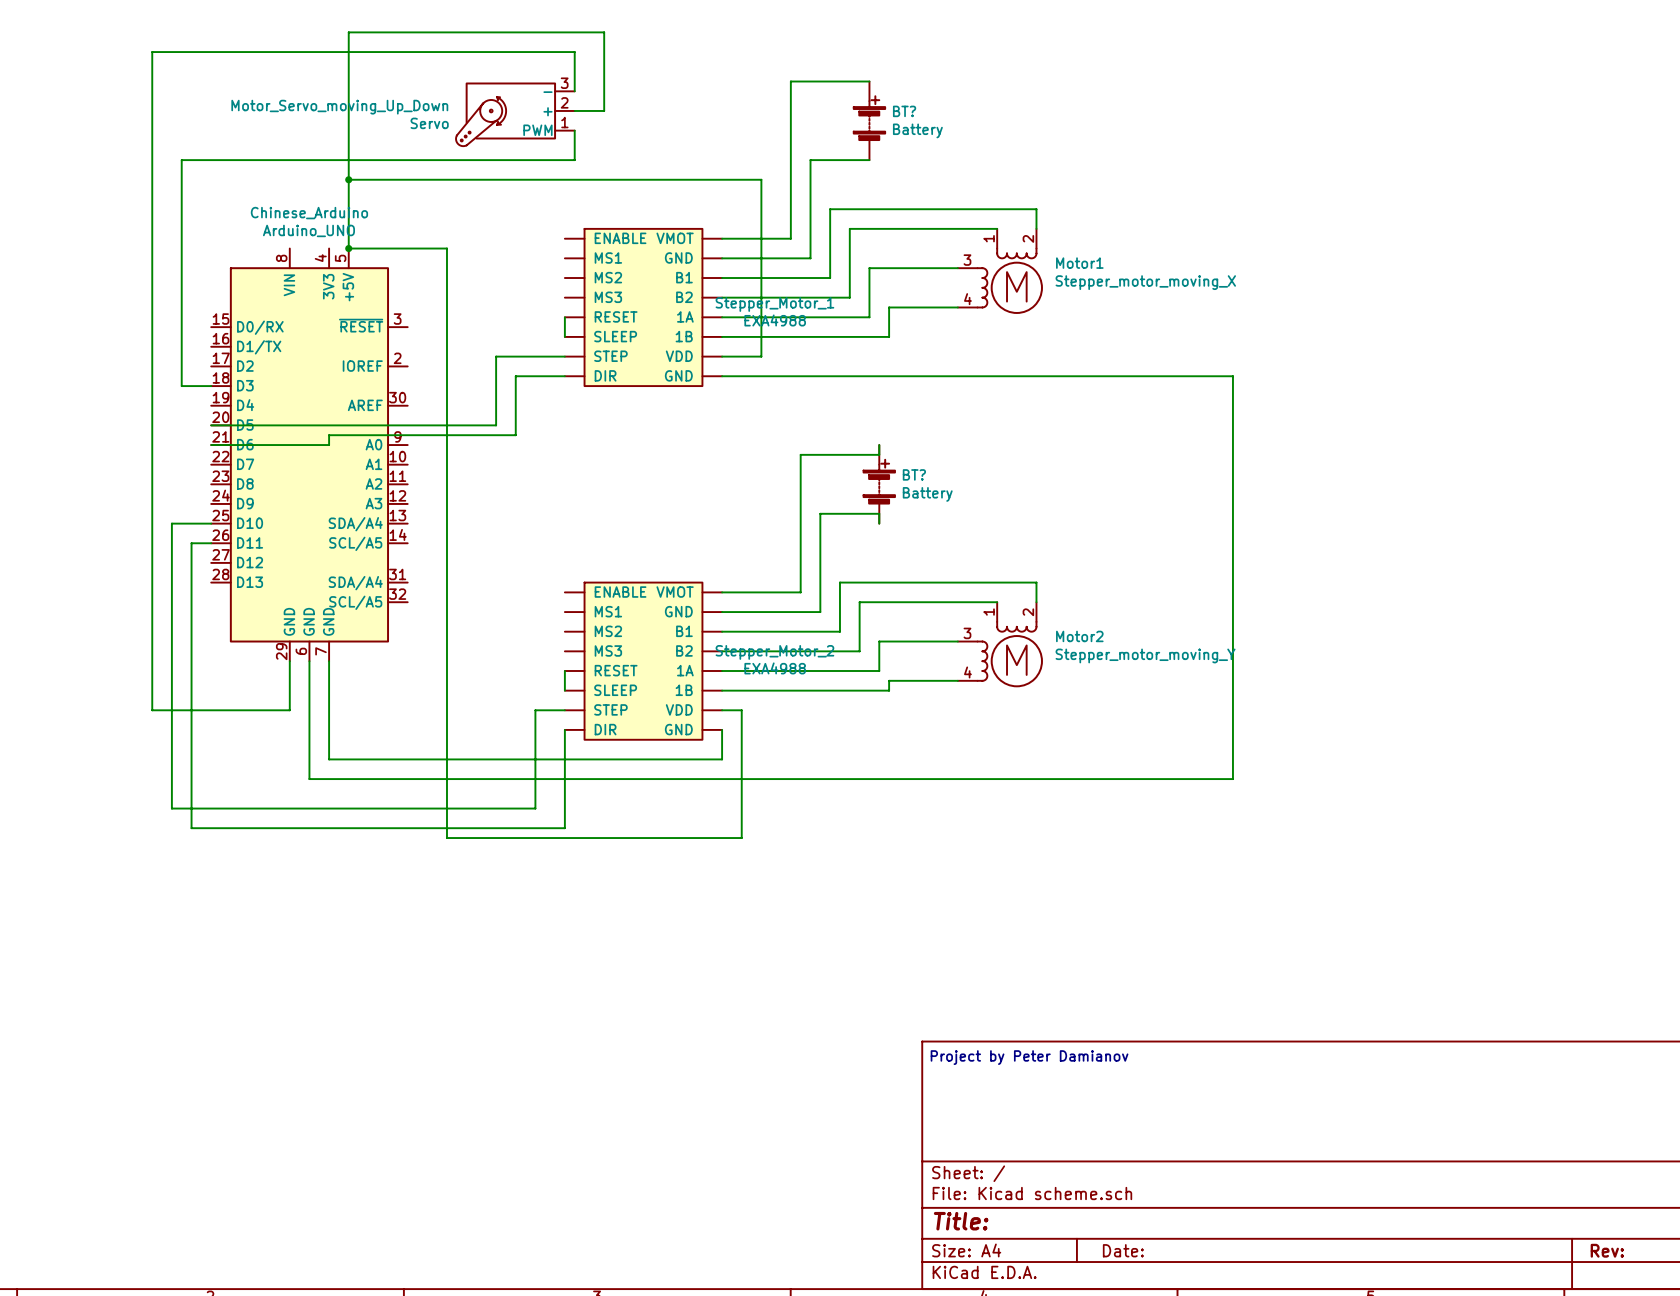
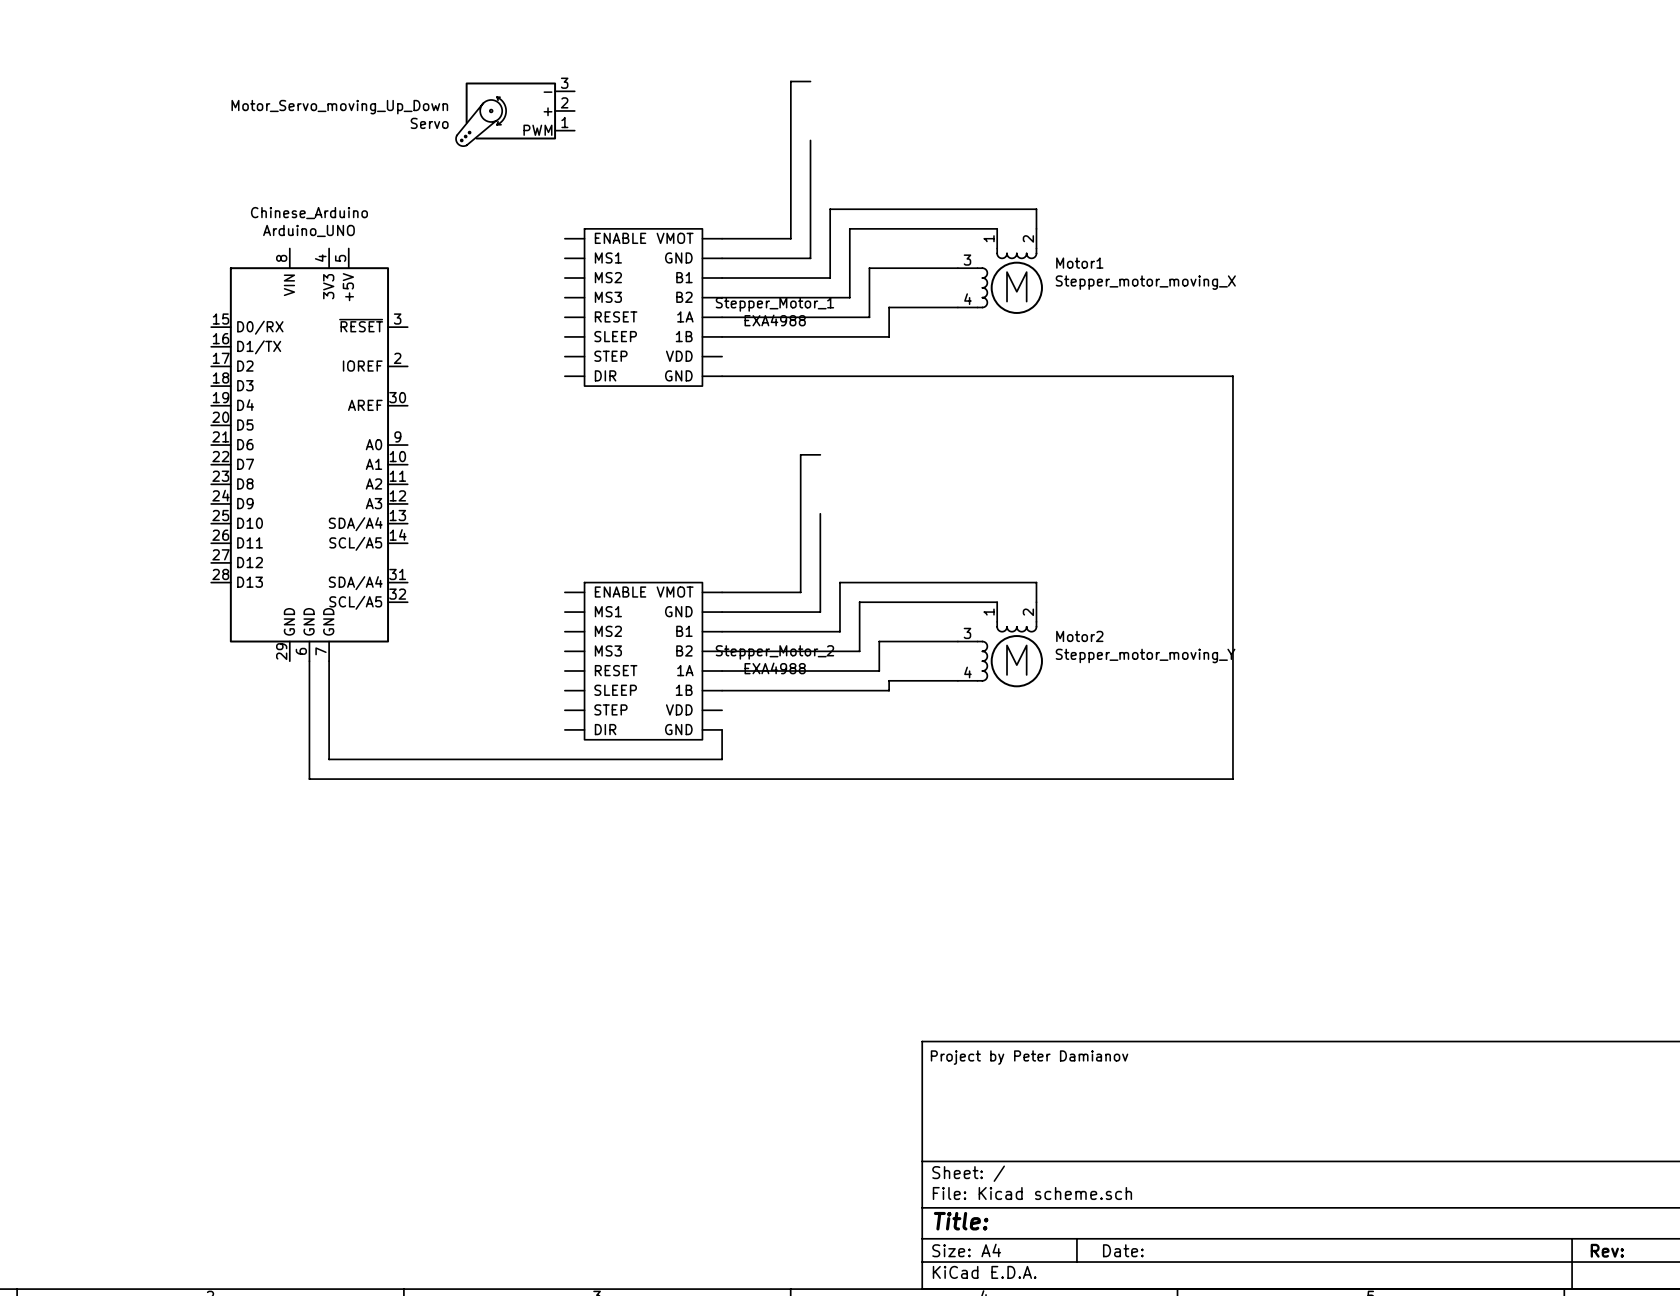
wire: (810, 81) (869, 81) -> none
wire: (574, 91) (574, 52) (152, 52) (152, 710) (289, 710) (289, 661) -> none
wire: (574, 110) (604, 110) (604, 32) (348, 32) (348, 248) (446, 248) (446, 838) (741, 838) (741, 710) (722, 710) -> none
BT?: Battery (869, 120) -> none
wire: (574, 130) (574, 160) (181, 160) (181, 386) (211, 386) -> none
wire: (810, 160) (869, 160) -> (810, 160) (810, 140)
wire: (348, 179) (761, 179) (761, 356) (722, 356) -> none
junction: (348, 179) -> none
junction: (348, 248) -> none
wire: (564, 317) (564, 336) -> none
wire: (564, 356) (496, 356) (496, 425) (211, 425) -> none
wire: (564, 376) (515, 376) (515, 435) (329, 435) (329, 445) (211, 445) -> none
wire: (879, 445) (879, 454) (820, 454) -> none
BT?: Battery (879, 484) -> none
wire: (820, 513) (879, 513) (879, 523) -> none
wire: (211, 523) (171, 523) (171, 808) (535, 808) (535, 710) (564, 710) -> none
wire: (211, 543) (191, 543) (191, 828) (564, 828) (564, 729) -> none
wire: (564, 670) (564, 690) -> none

